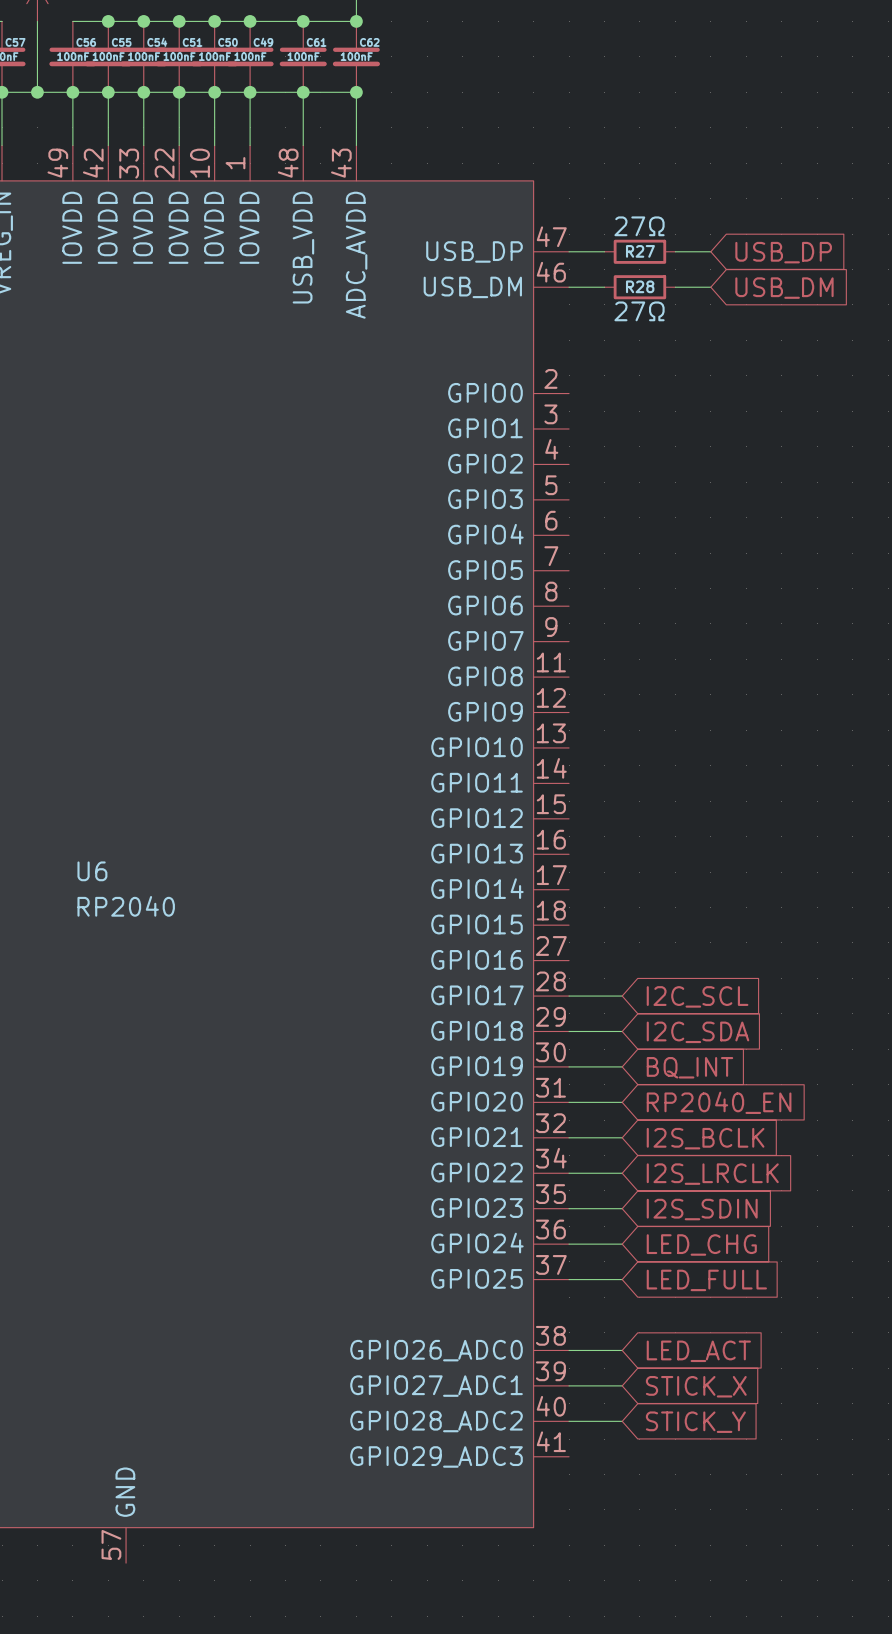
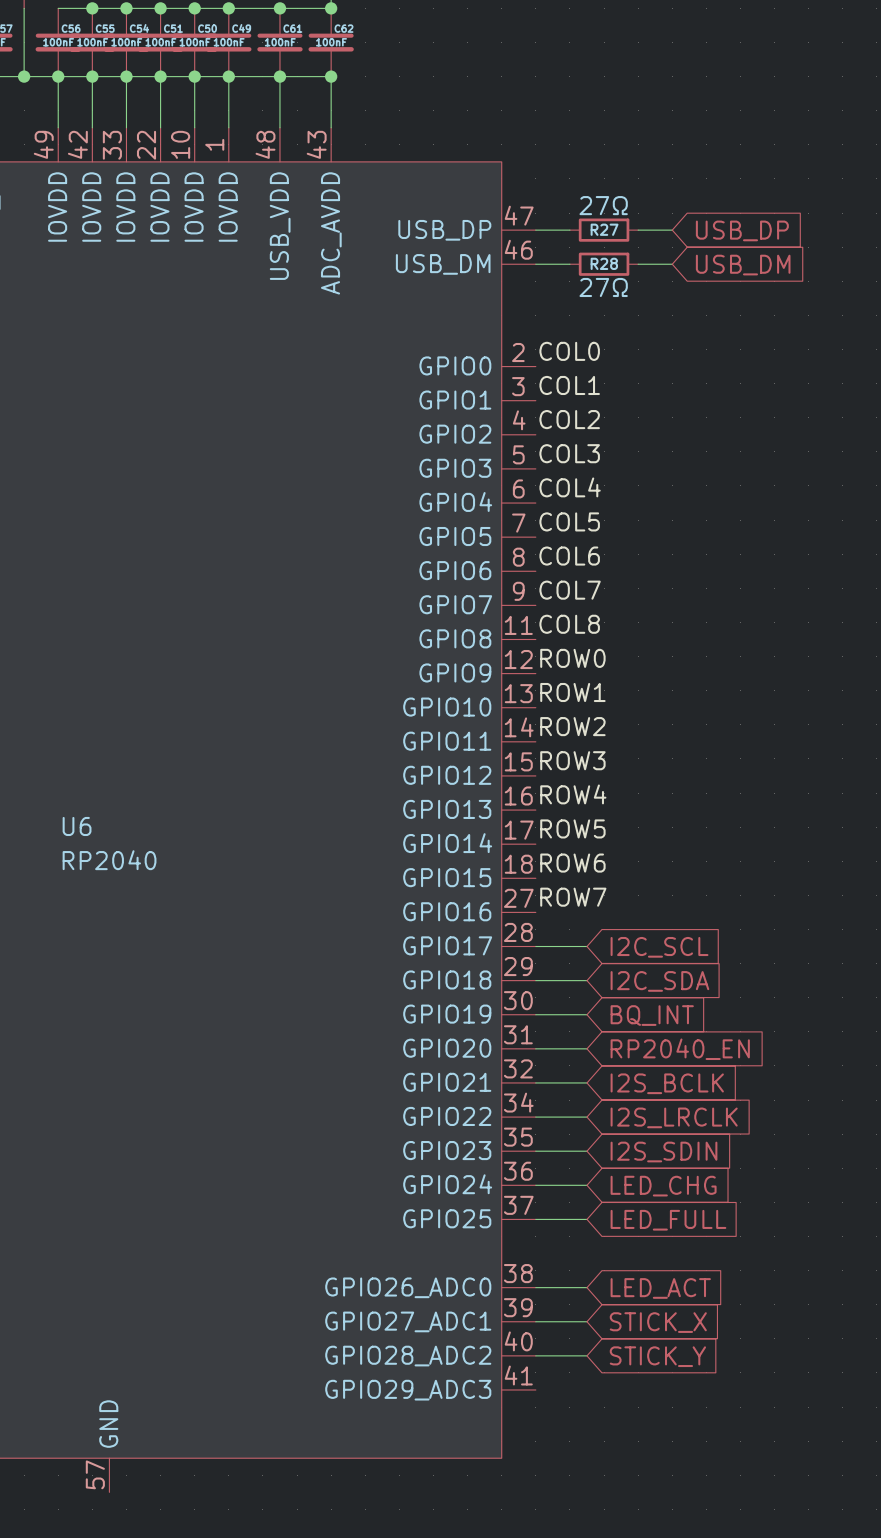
label: none -> COL0 (569, 351)
label: none -> COL1 (569, 385)
label: none -> COL2 (569, 419)
label: none -> COL3 (569, 453)
label: none -> COL4 (570, 487)
label: none -> COL5 (569, 521)
label: none -> COL6 (569, 556)
label: none -> COL7 (570, 590)
label: none -> COL8 (569, 624)
label: none -> ROW0 (572, 658)
label: none -> ROW1 (572, 692)
label: none -> ROW2 (572, 726)
label: none -> ROW3 (572, 760)
label: none -> ROW4 (573, 794)
label: none -> ROW5 (572, 828)
label: none -> ROW6 (572, 863)
label: none -> ROW7 (573, 897)

